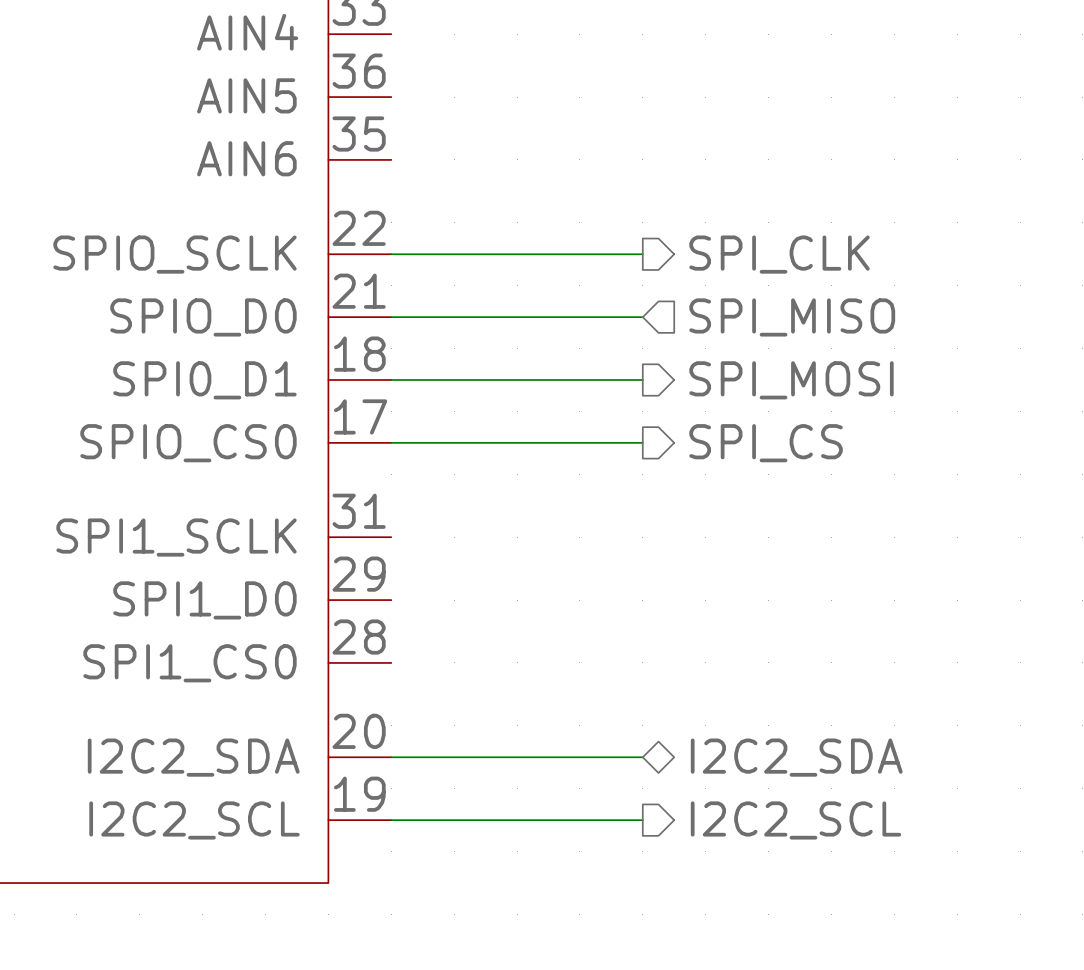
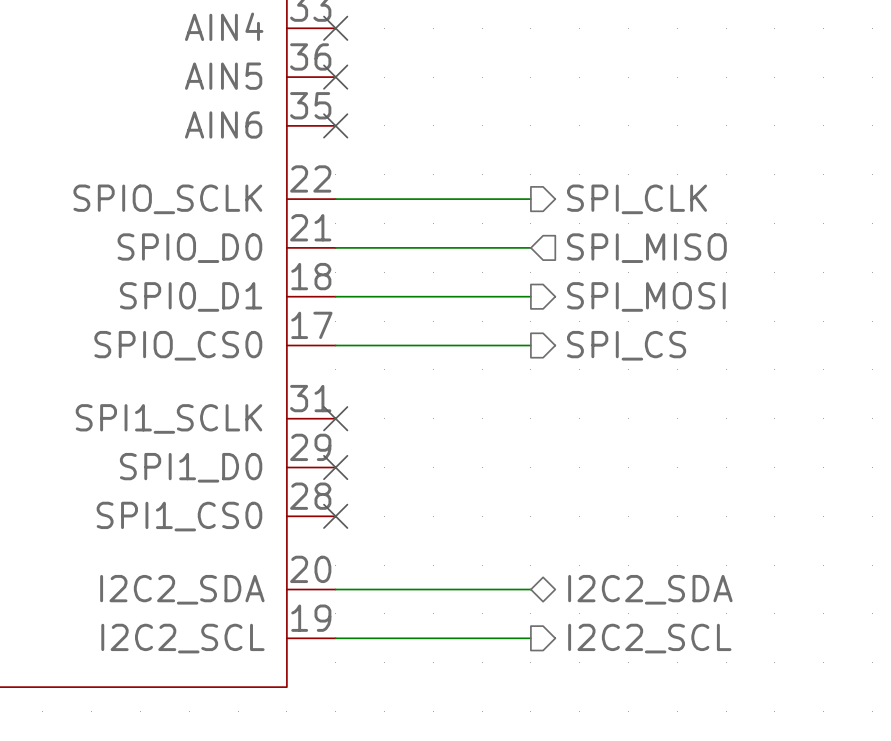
no-connect mark: none -> (335, 28)
no-connect mark: none -> (335, 77)
no-connect mark: none -> (335, 125)
no-connect mark: none -> (335, 418)
no-connect mark: none -> (335, 467)
no-connect mark: none -> (335, 516)

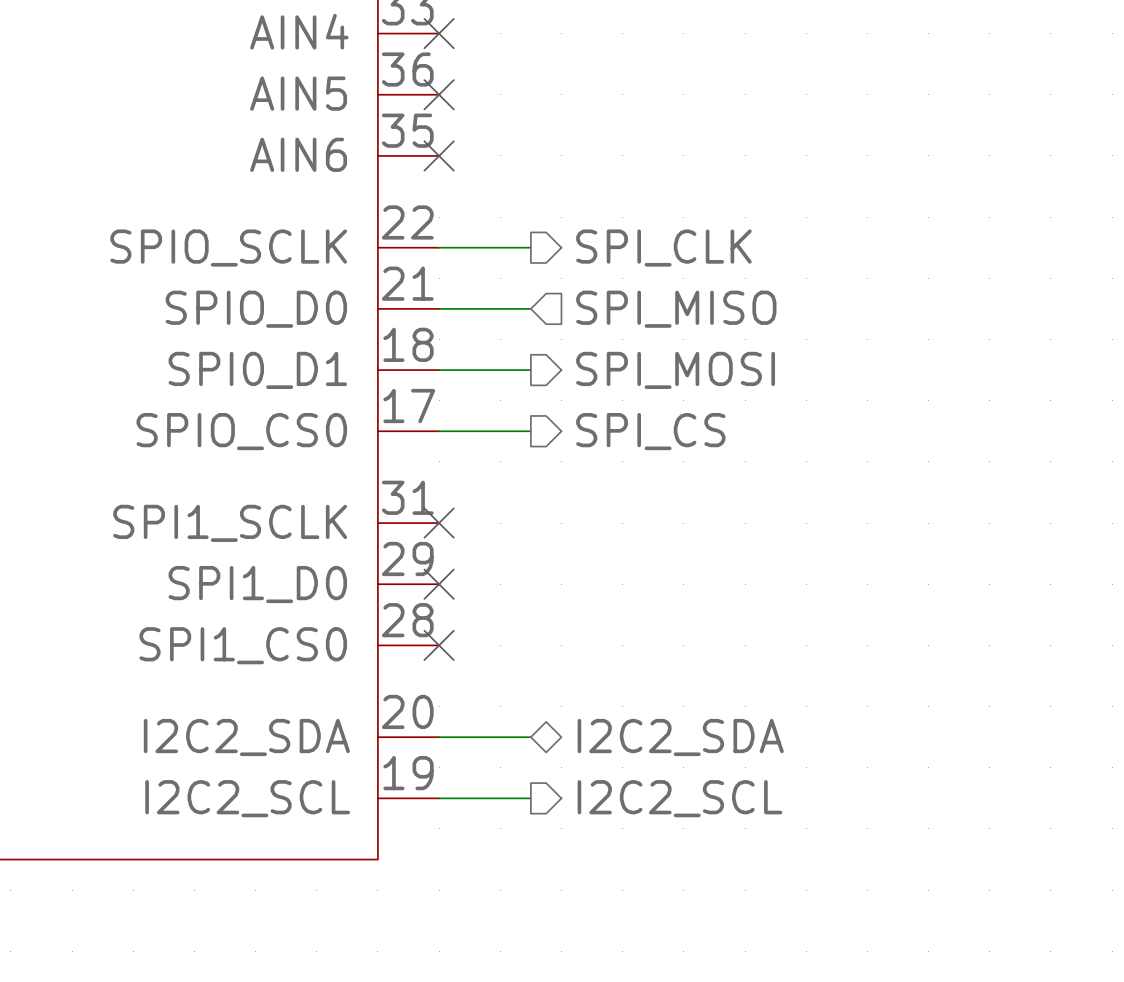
wire: (408, 199) (530, 199) -> none
hierarchical label position: SPI_CLK (637, 199) -> SPI_CLK (663, 248)
wire: (408, 247) (530, 247) -> none
hierarchical label position: SPI_MISO (646, 248) -> SPI_MISO (676, 309)
wire: (408, 296) (530, 296) -> none
hierarchical label position: SPI_MOSI (646, 296) -> SPI_MOSI (675, 370)
wire: (408, 345) (530, 345) -> none
hierarchical label position: SPI_CS (626, 345) -> SPI_CS (650, 431)
wire: (408, 589) (530, 589) -> none
hierarchical label position: I2C2_SDA (650, 589) -> I2C2_SDA (680, 737)
wire: (408, 638) (530, 638) -> none
hierarchical label position: I2C2_SCL (649, 638) -> I2C2_SCL (679, 798)

